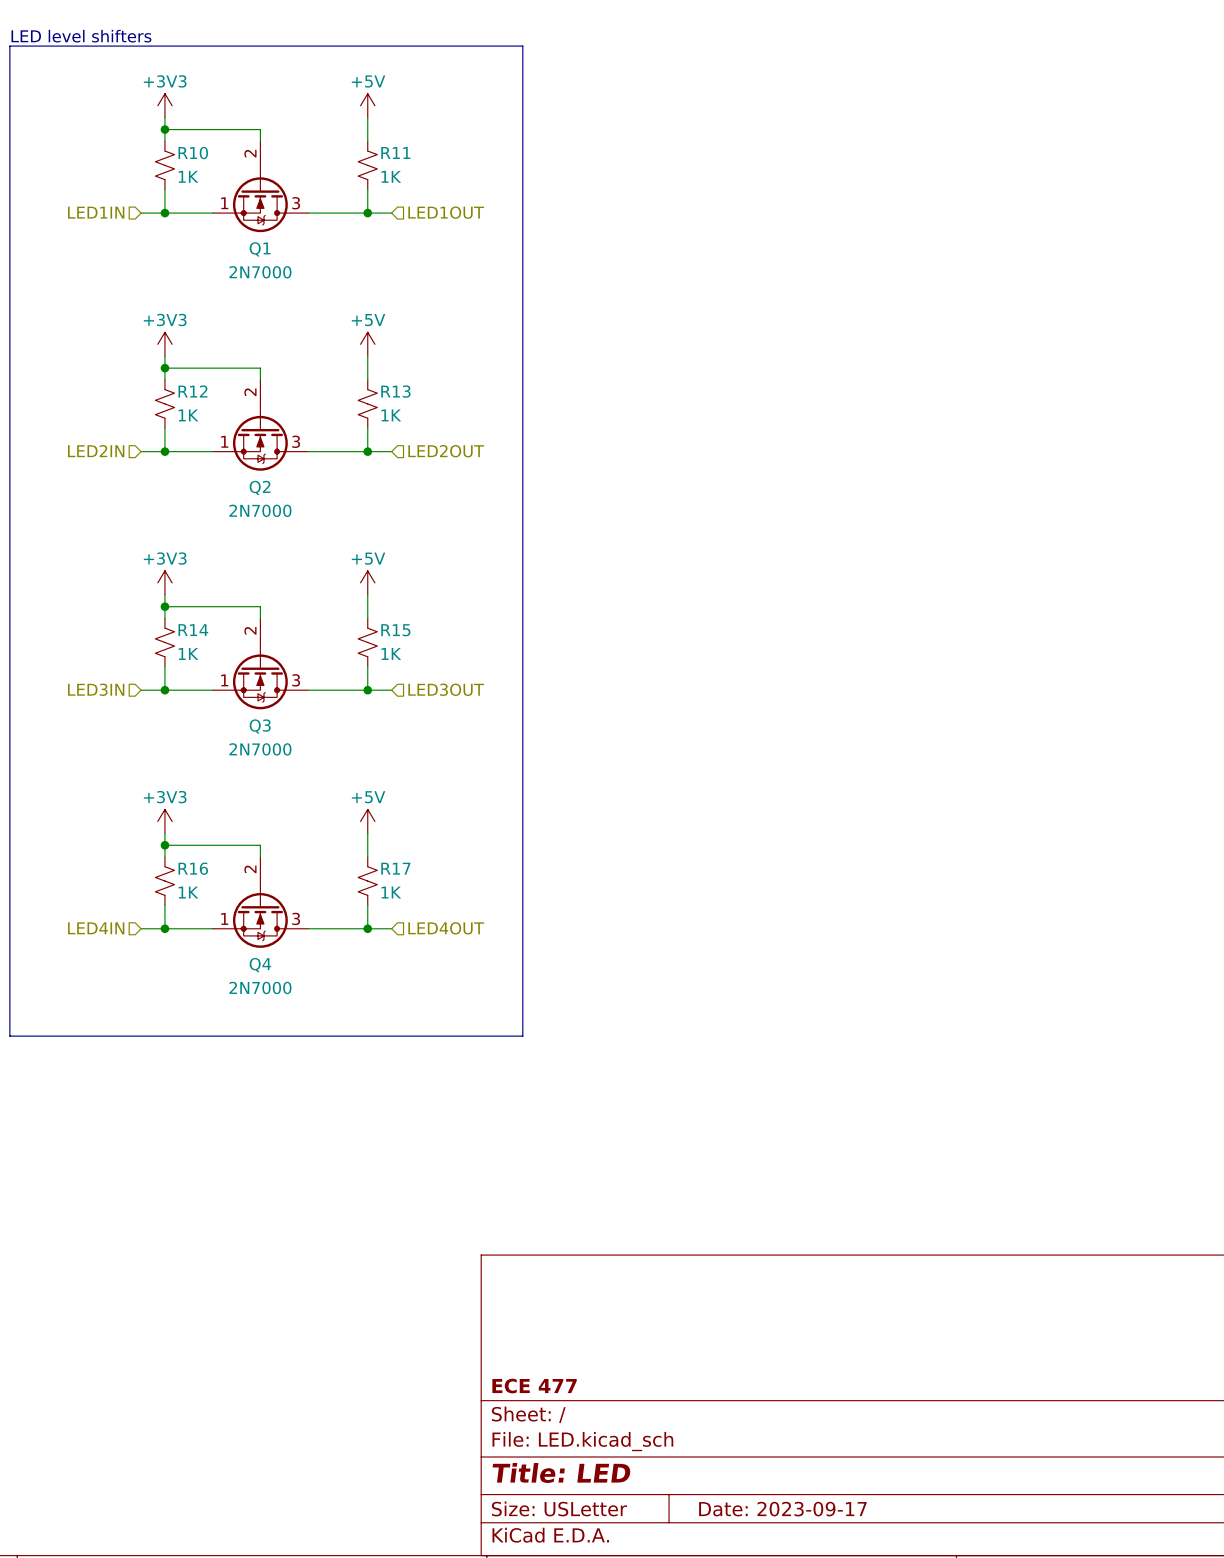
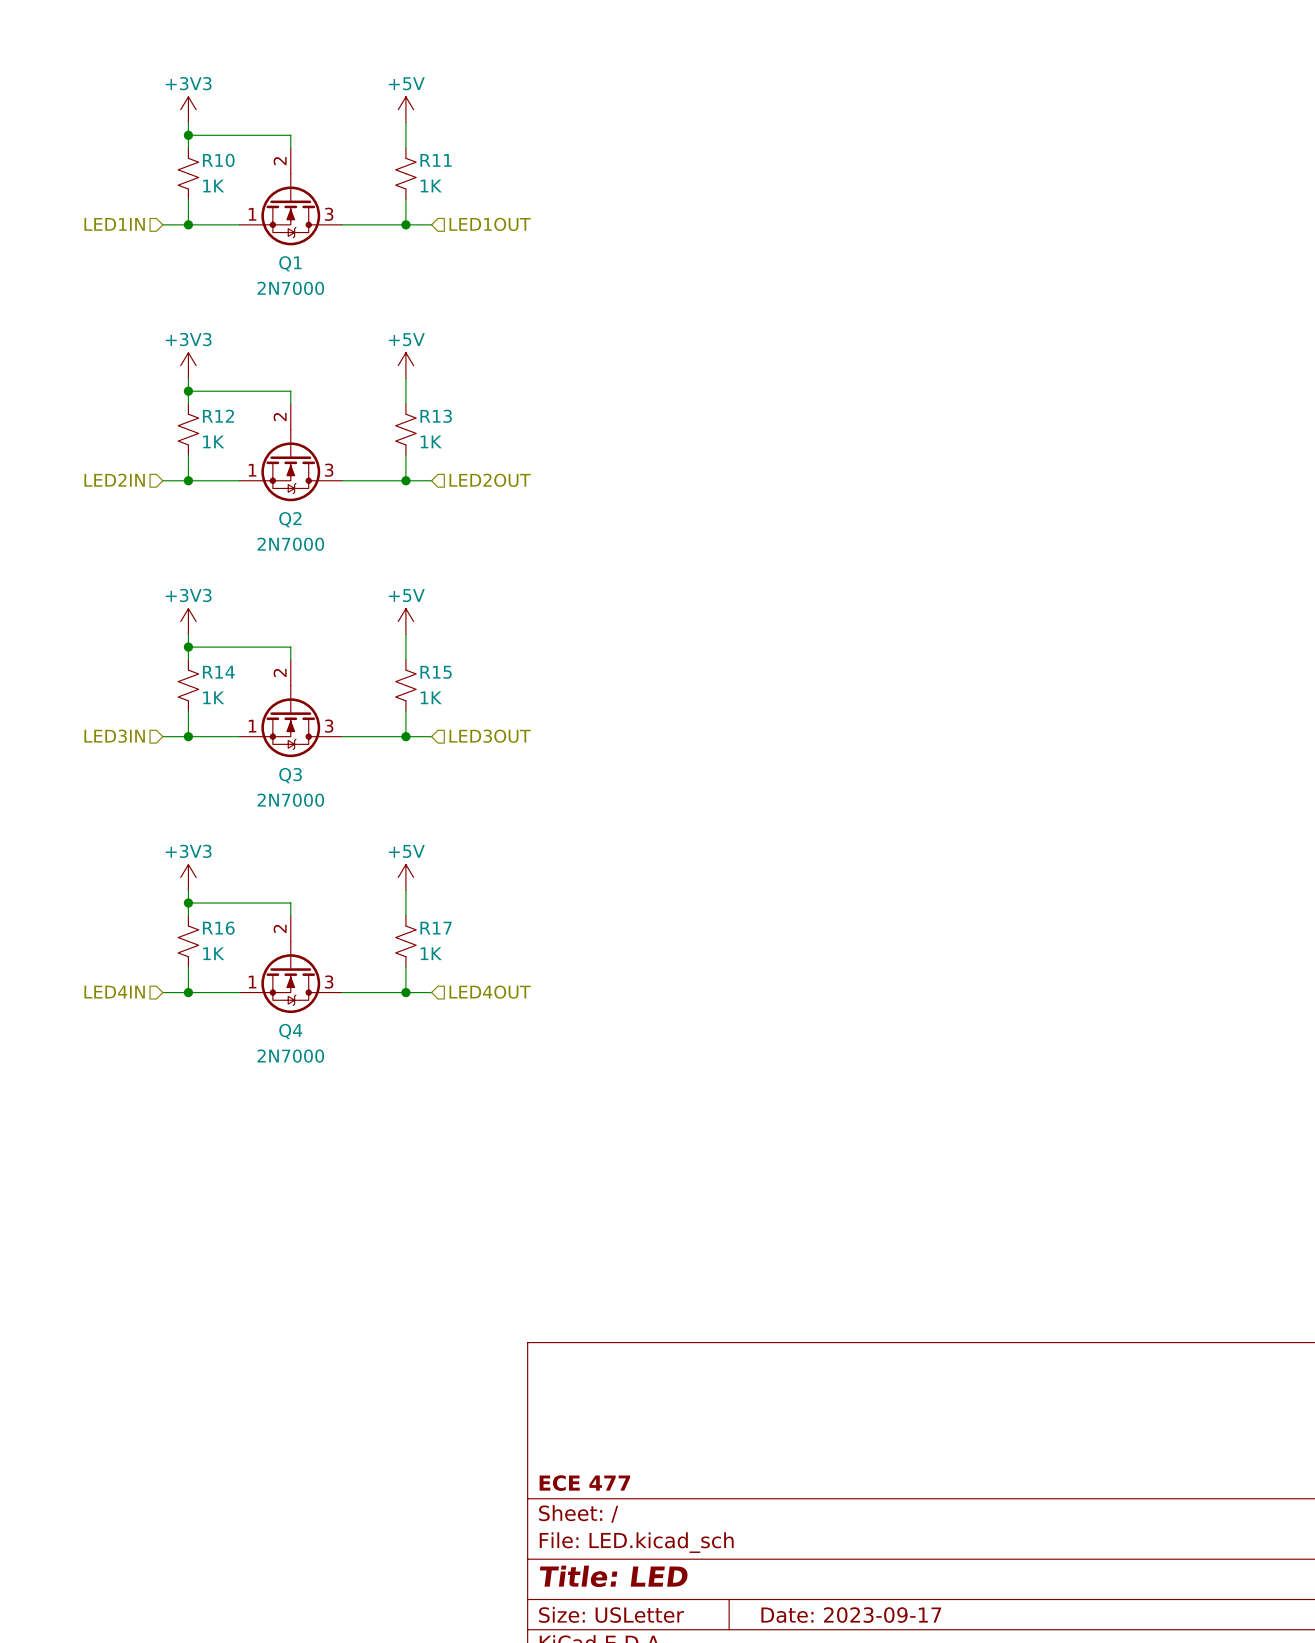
text: LED level shifters (81, 36) -> none
line: (9, 46) (522, 46) (522, 1036) (9, 1036) (9, 46) -> none

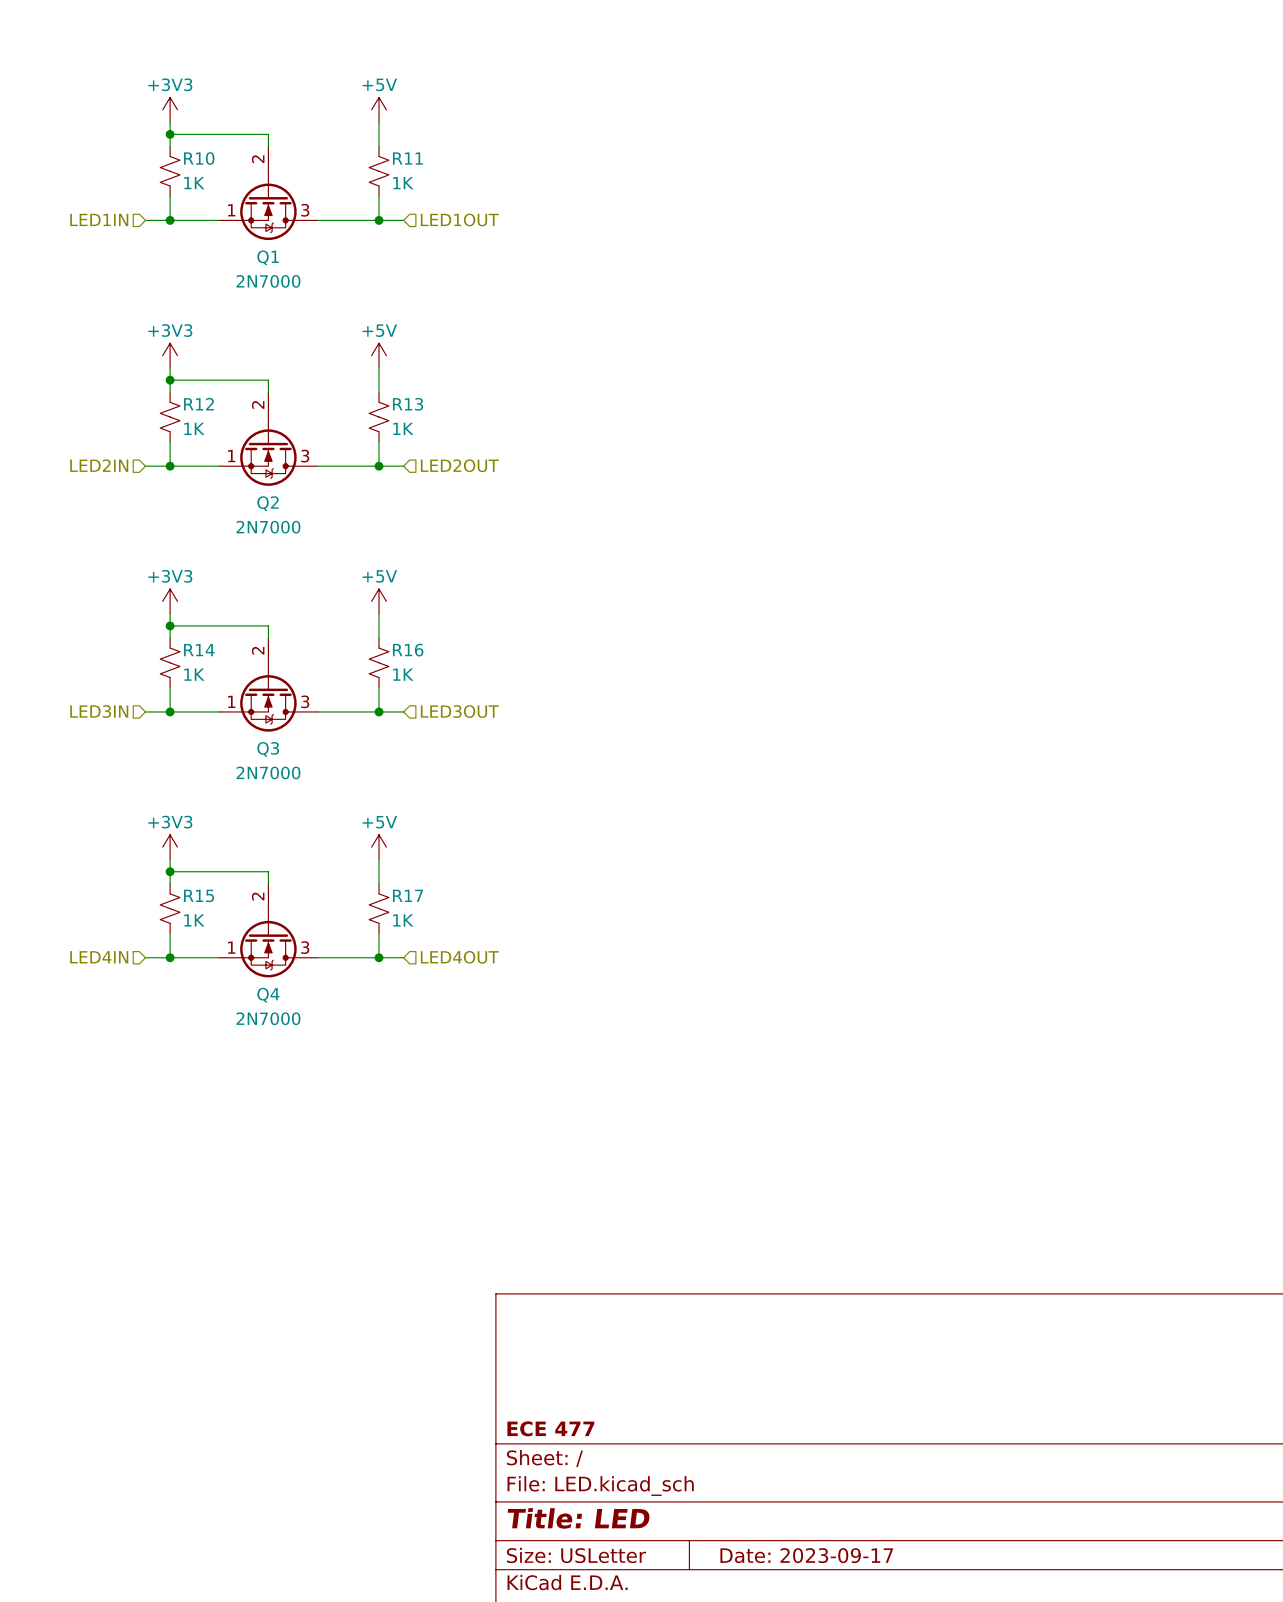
R15 name: R15 (436, 672) -> R16 (408, 650)
R16 name: R16 (218, 928) -> R15 (199, 895)

